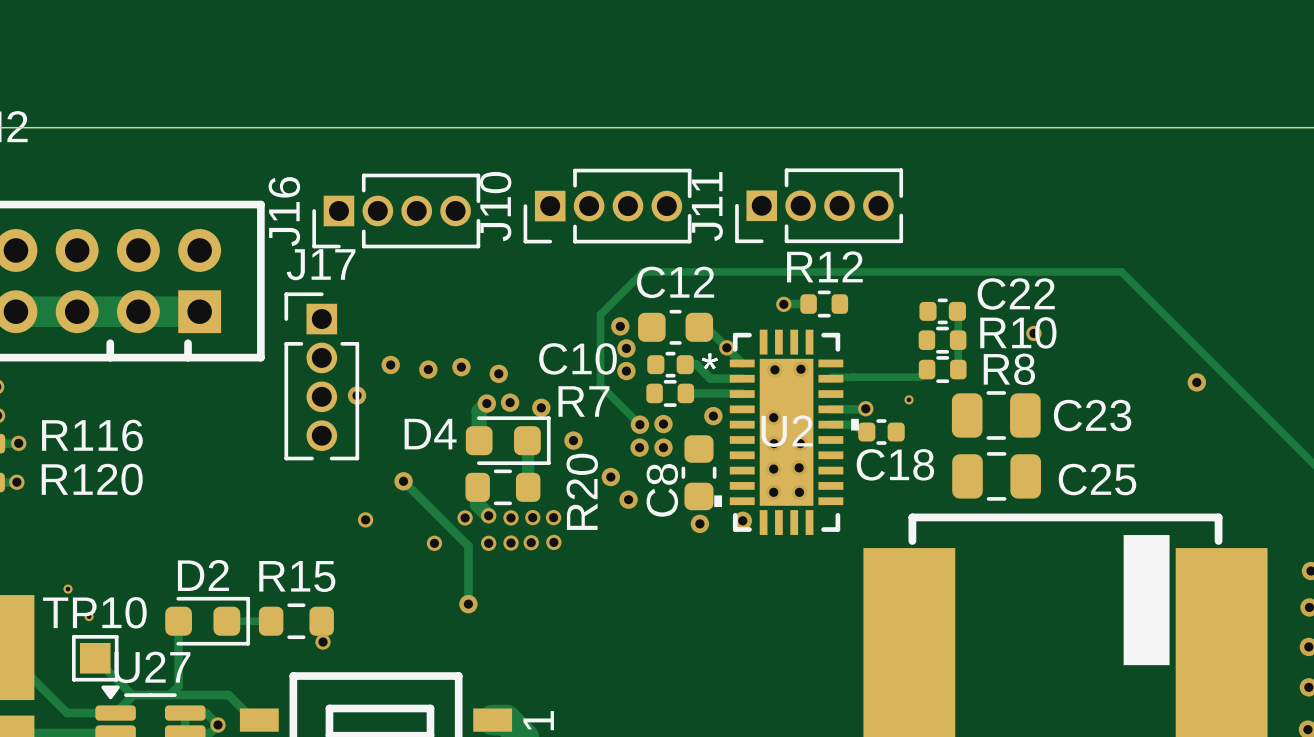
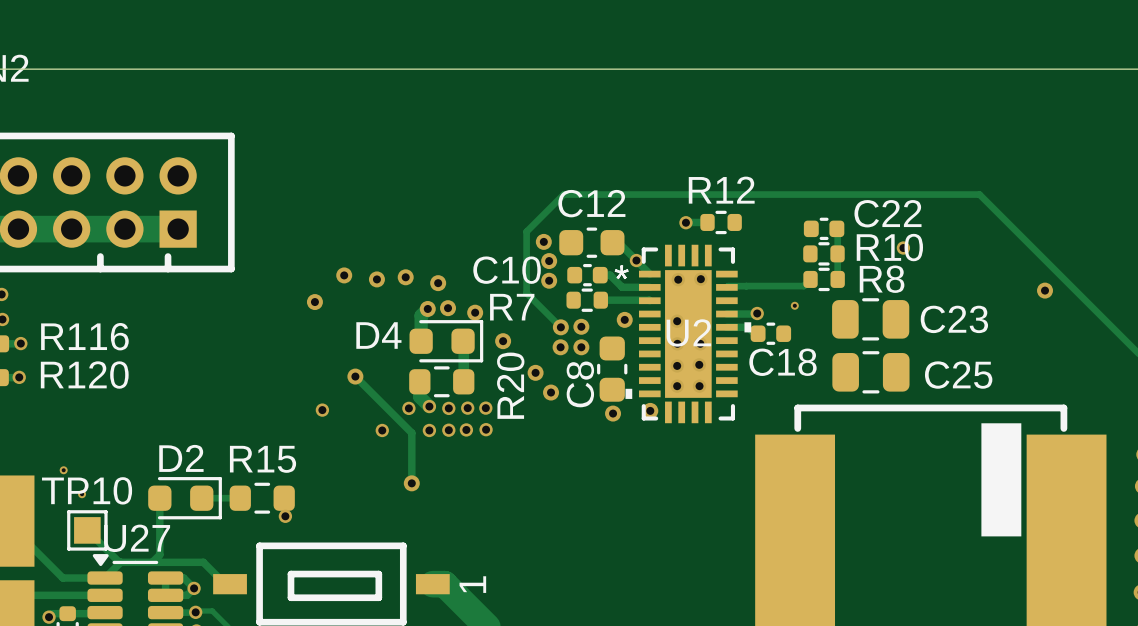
J11: (819, 205) -> none
J10: (607, 206) -> none
J16: (396, 210) -> none
J17: (321, 376) -> none

